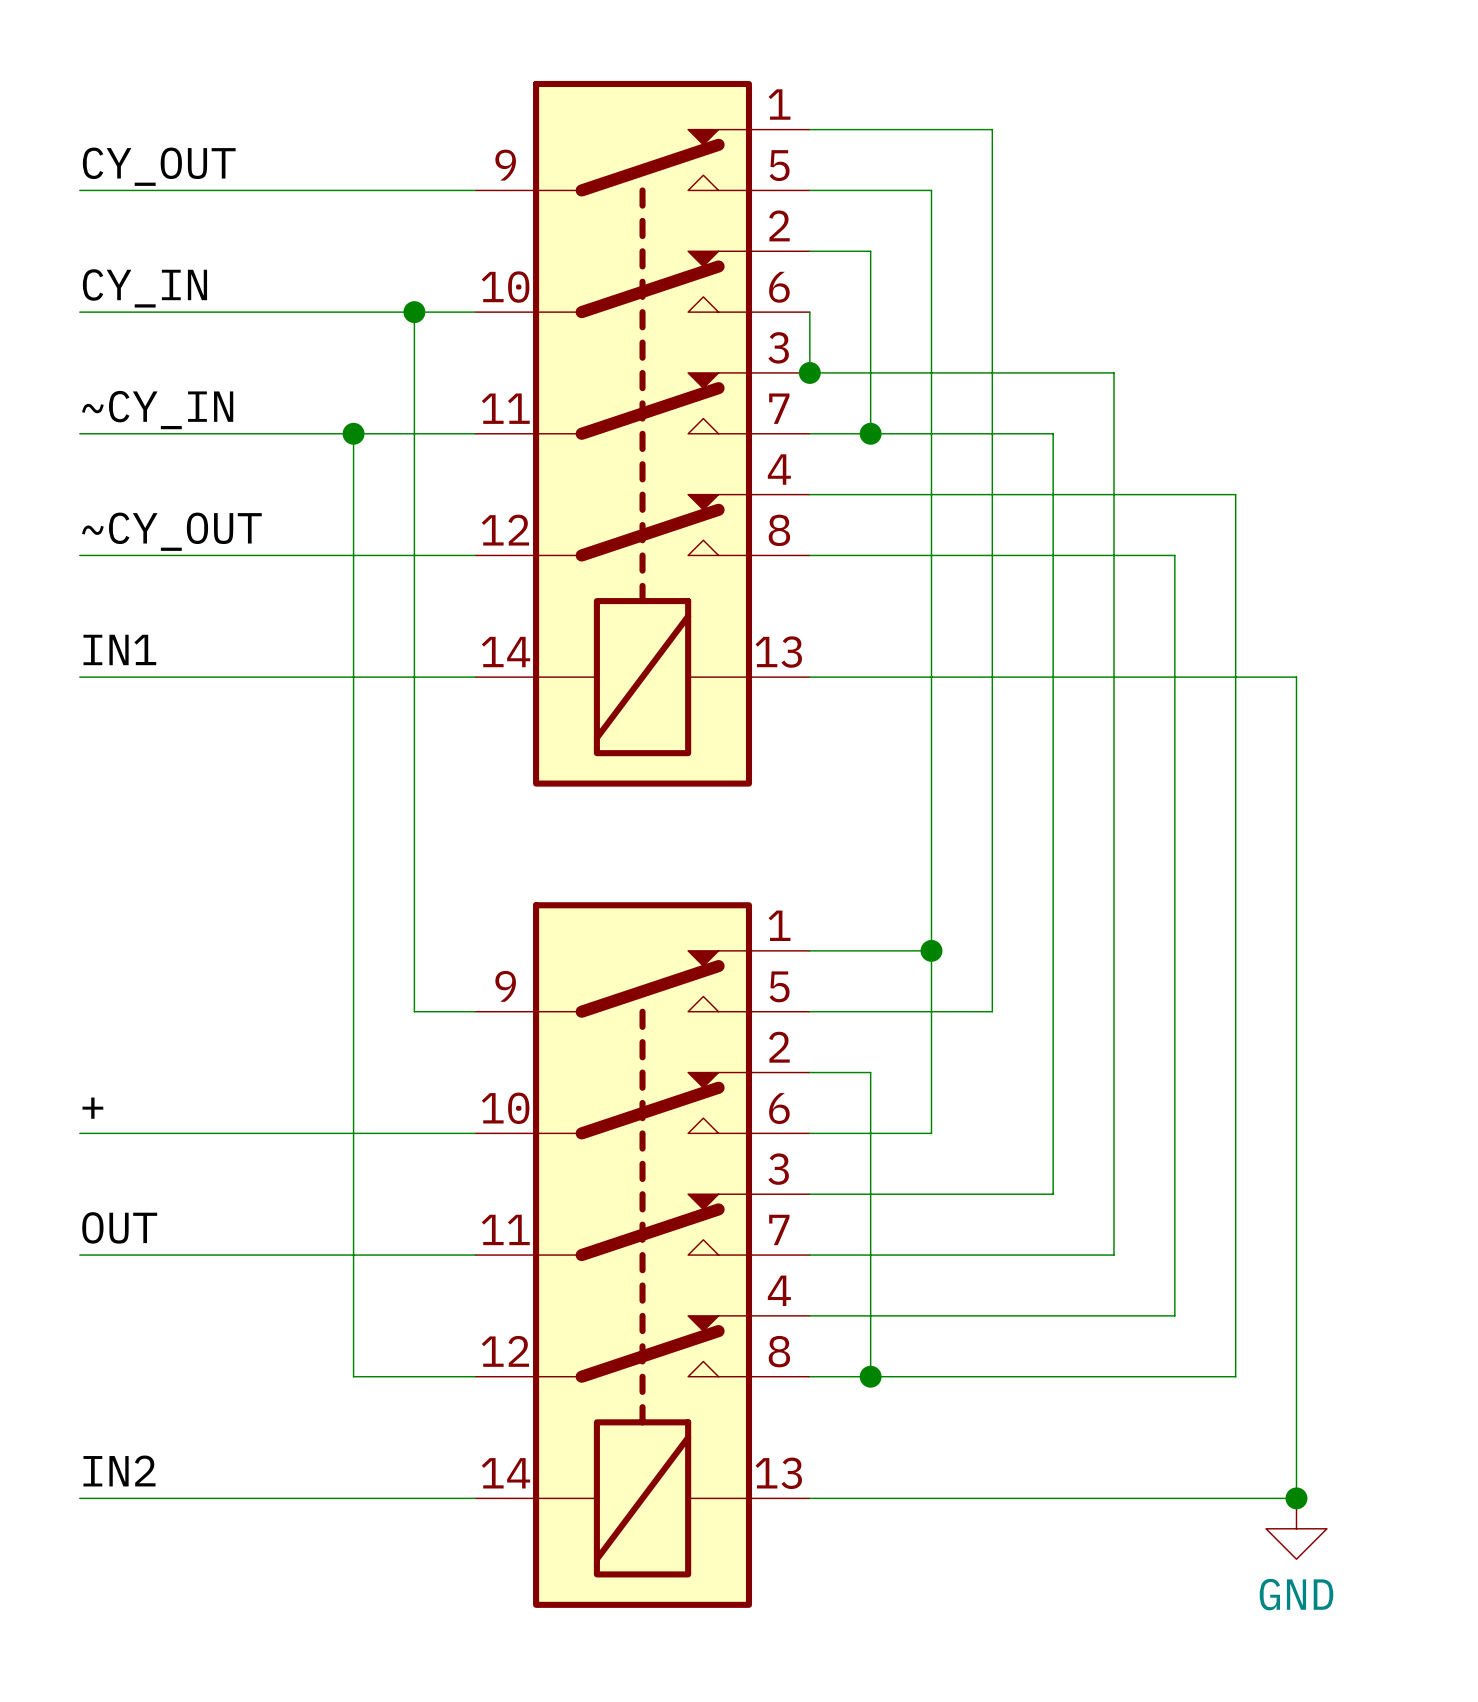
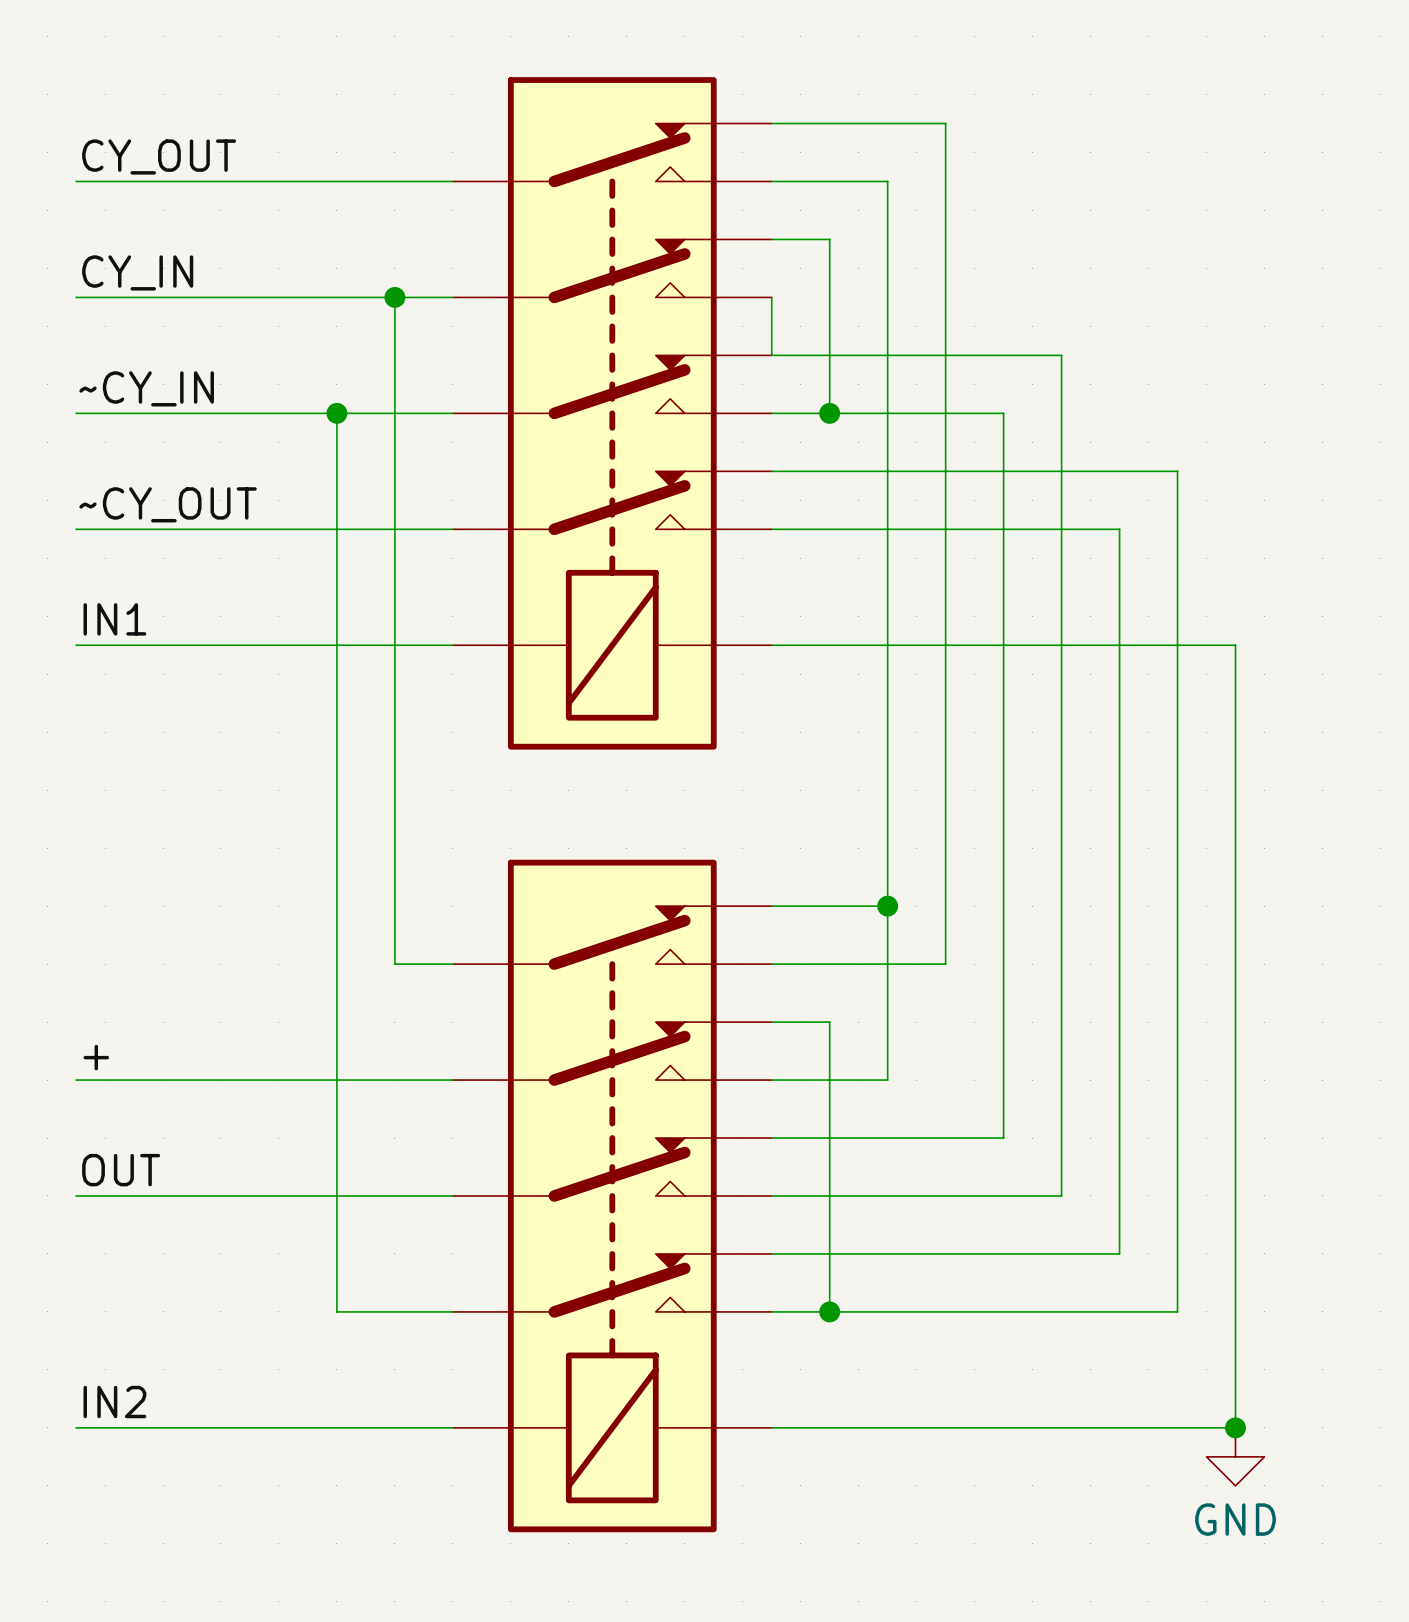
part symbol: [475, 80, 810, 787] -> [452, 77, 772, 750]
junction: (809, 372) -> none
part symbol: [475, 902, 810, 1608] -> [452, 859, 772, 1533]

